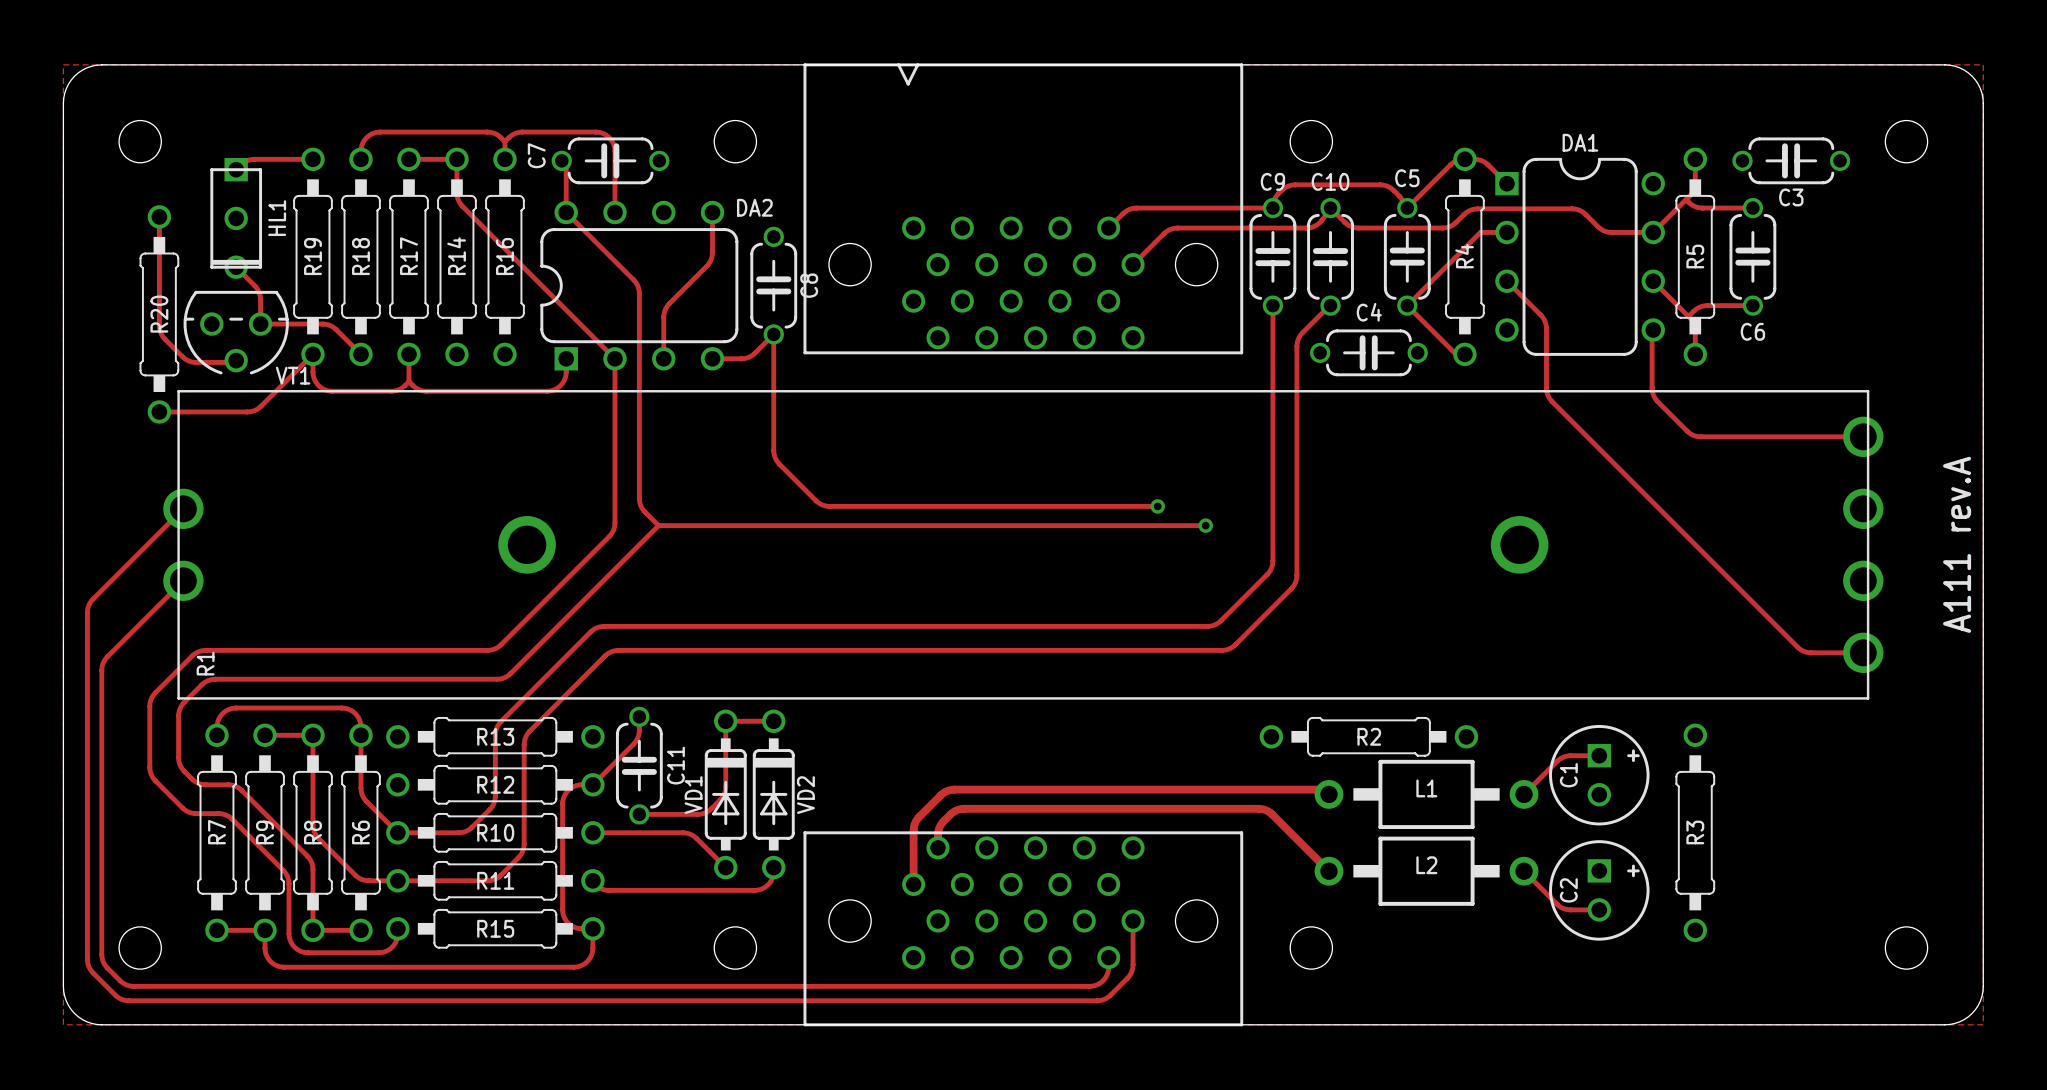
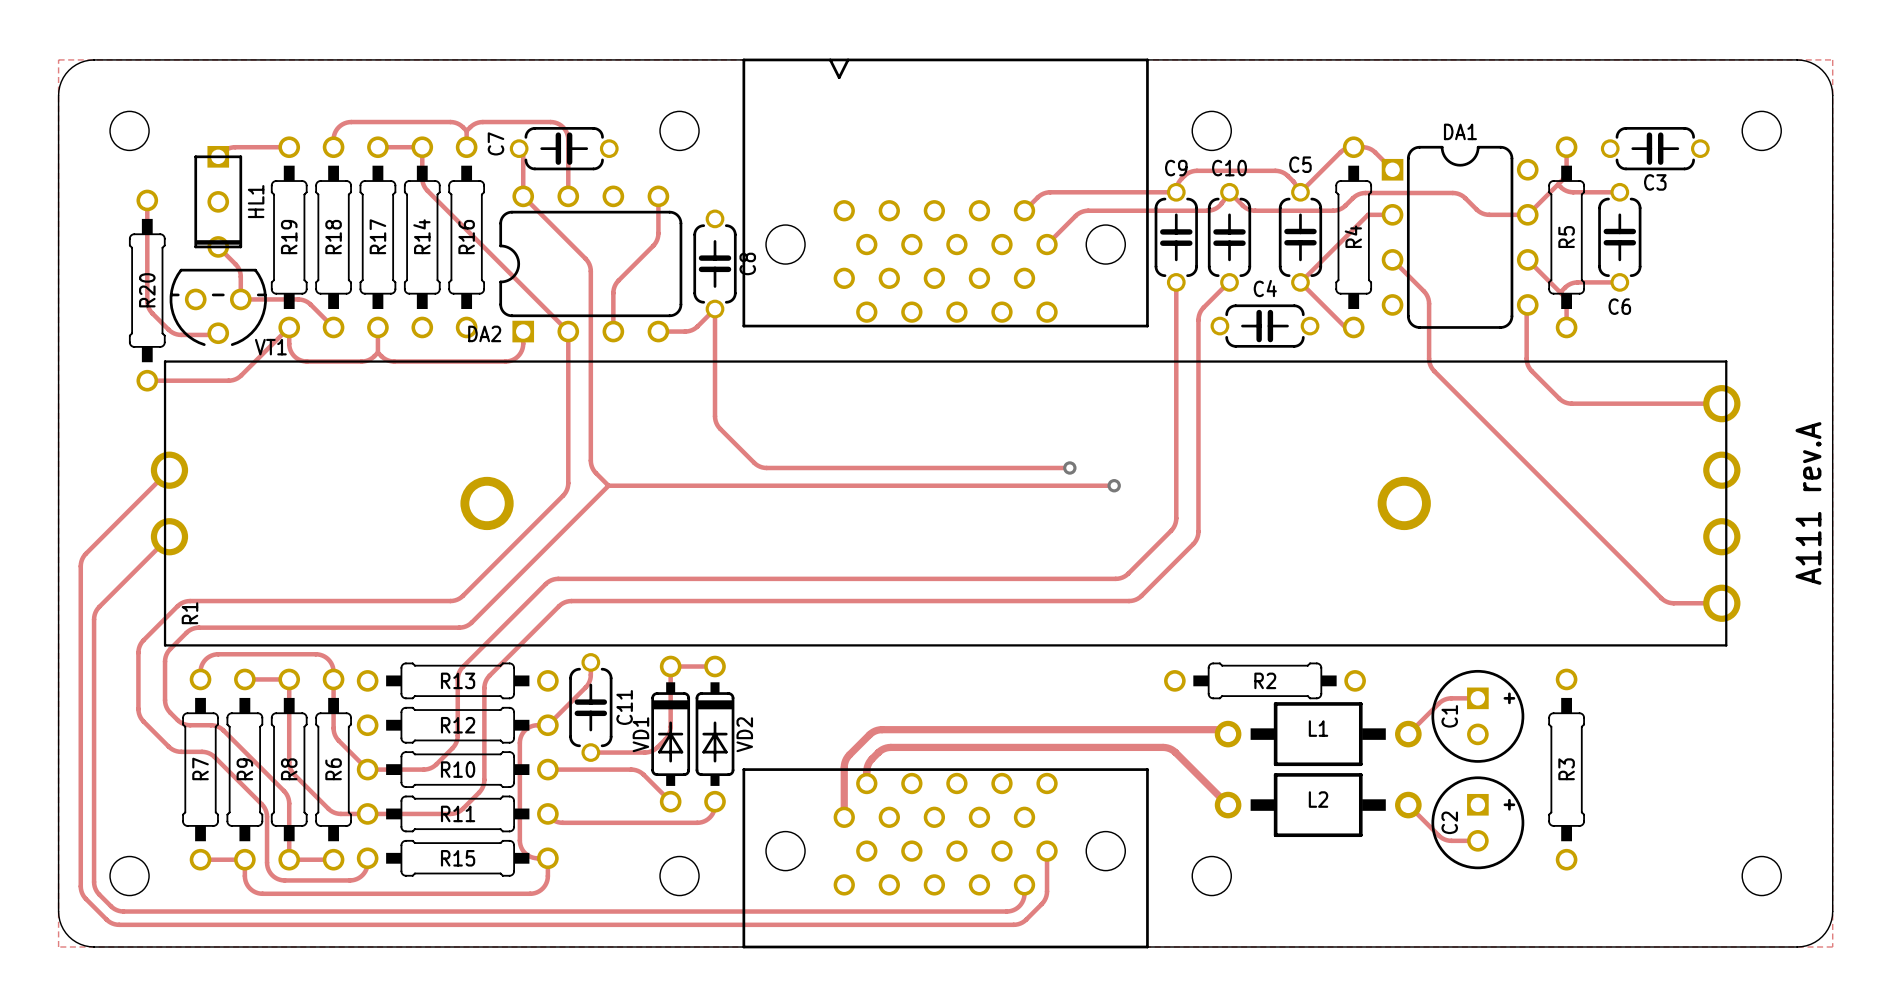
DA2 name position: DA2 (754, 207) -> DA2 (484, 333)

